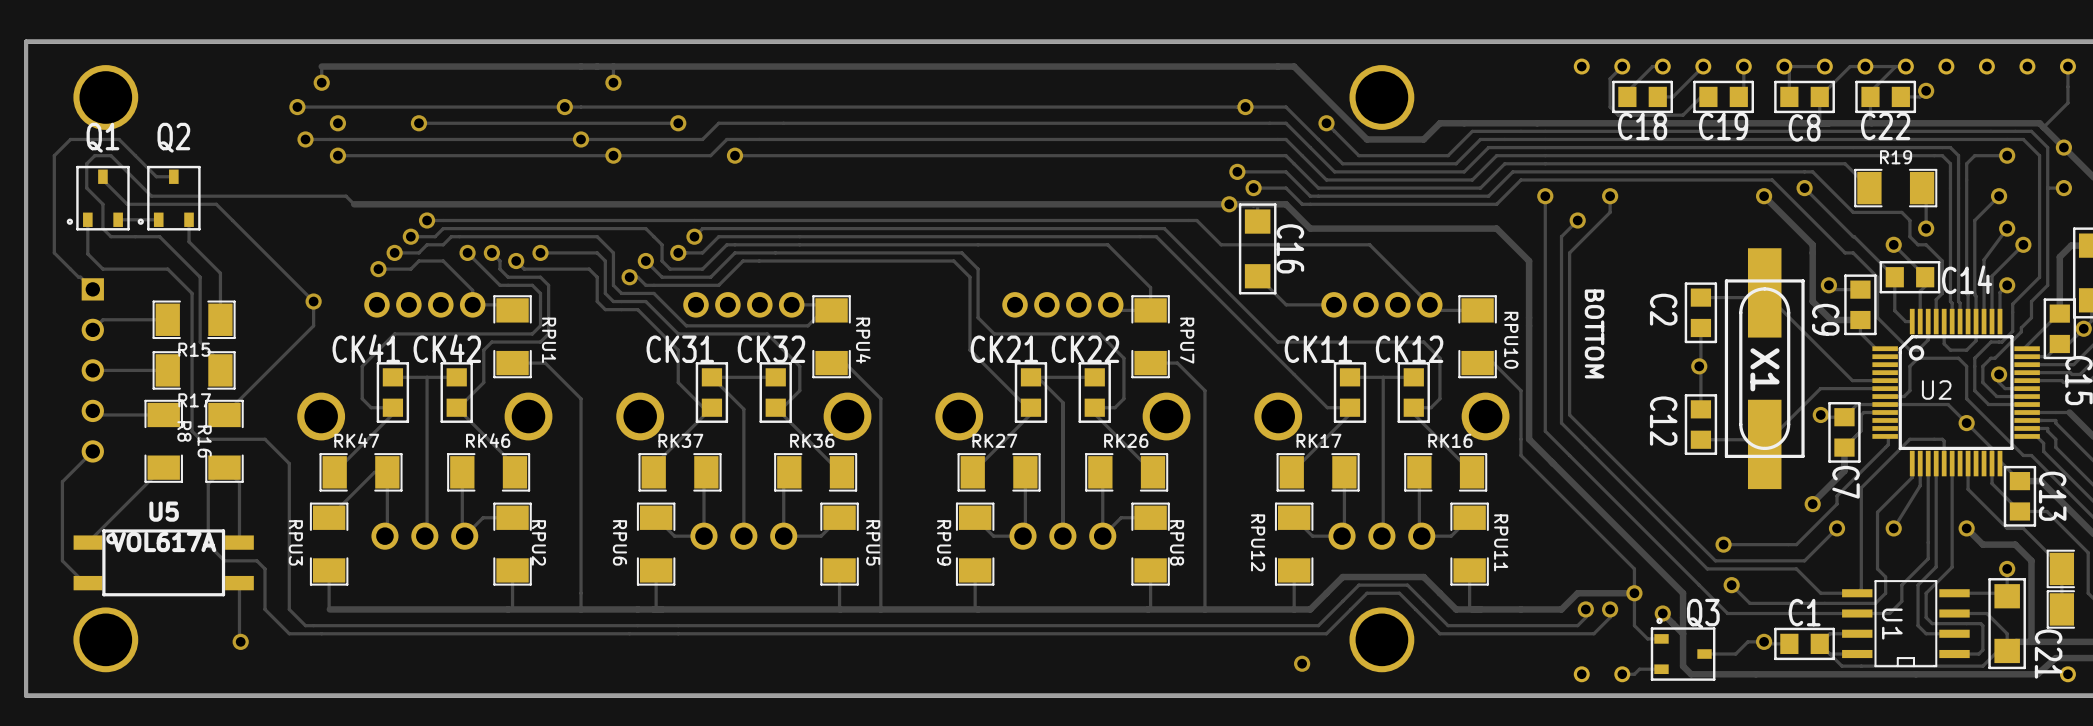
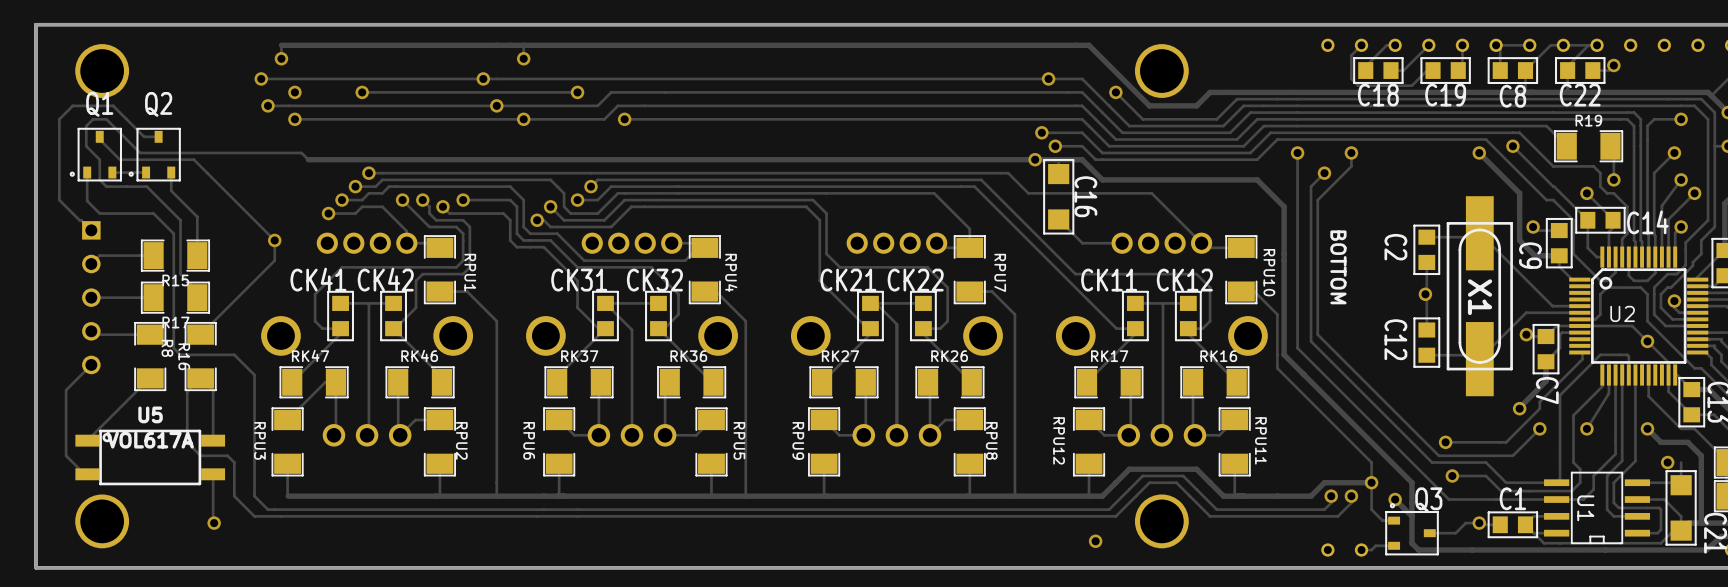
track: (1772, 568) (1796, 568) (1820, 593) -> (1486, 462) (1506, 482) (1526, 482)
via position: (2007, 568) -> (1667, 462)
track: (1731, 585) (1749, 603) (1790, 603) -> (1452, 475) (1486, 475) (1501, 491)

